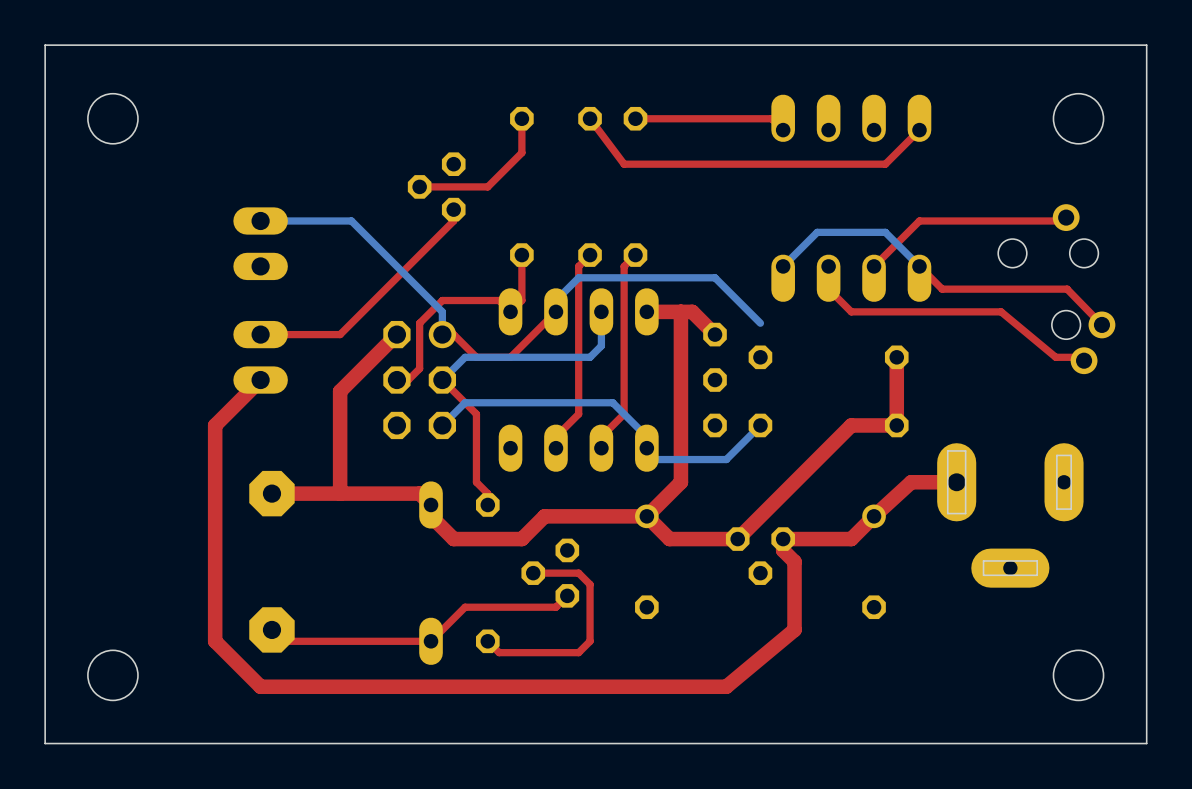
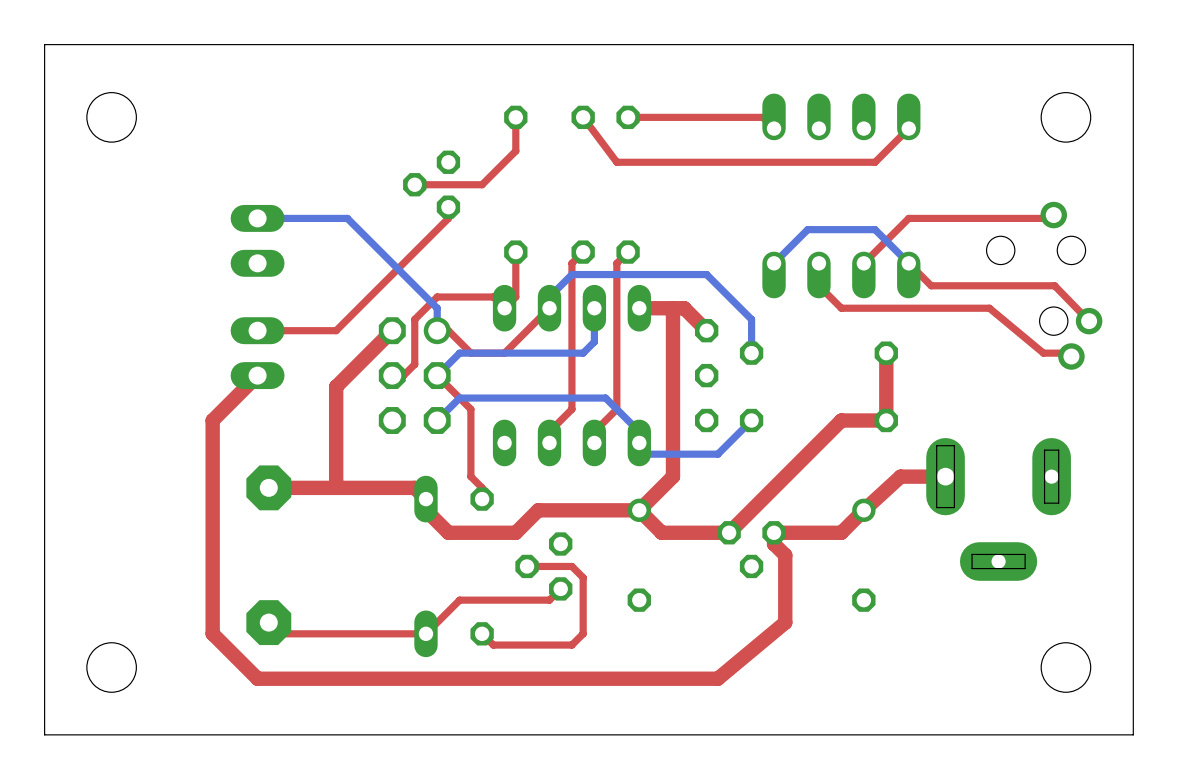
bottom track: none -> (751, 319) (751, 353)

